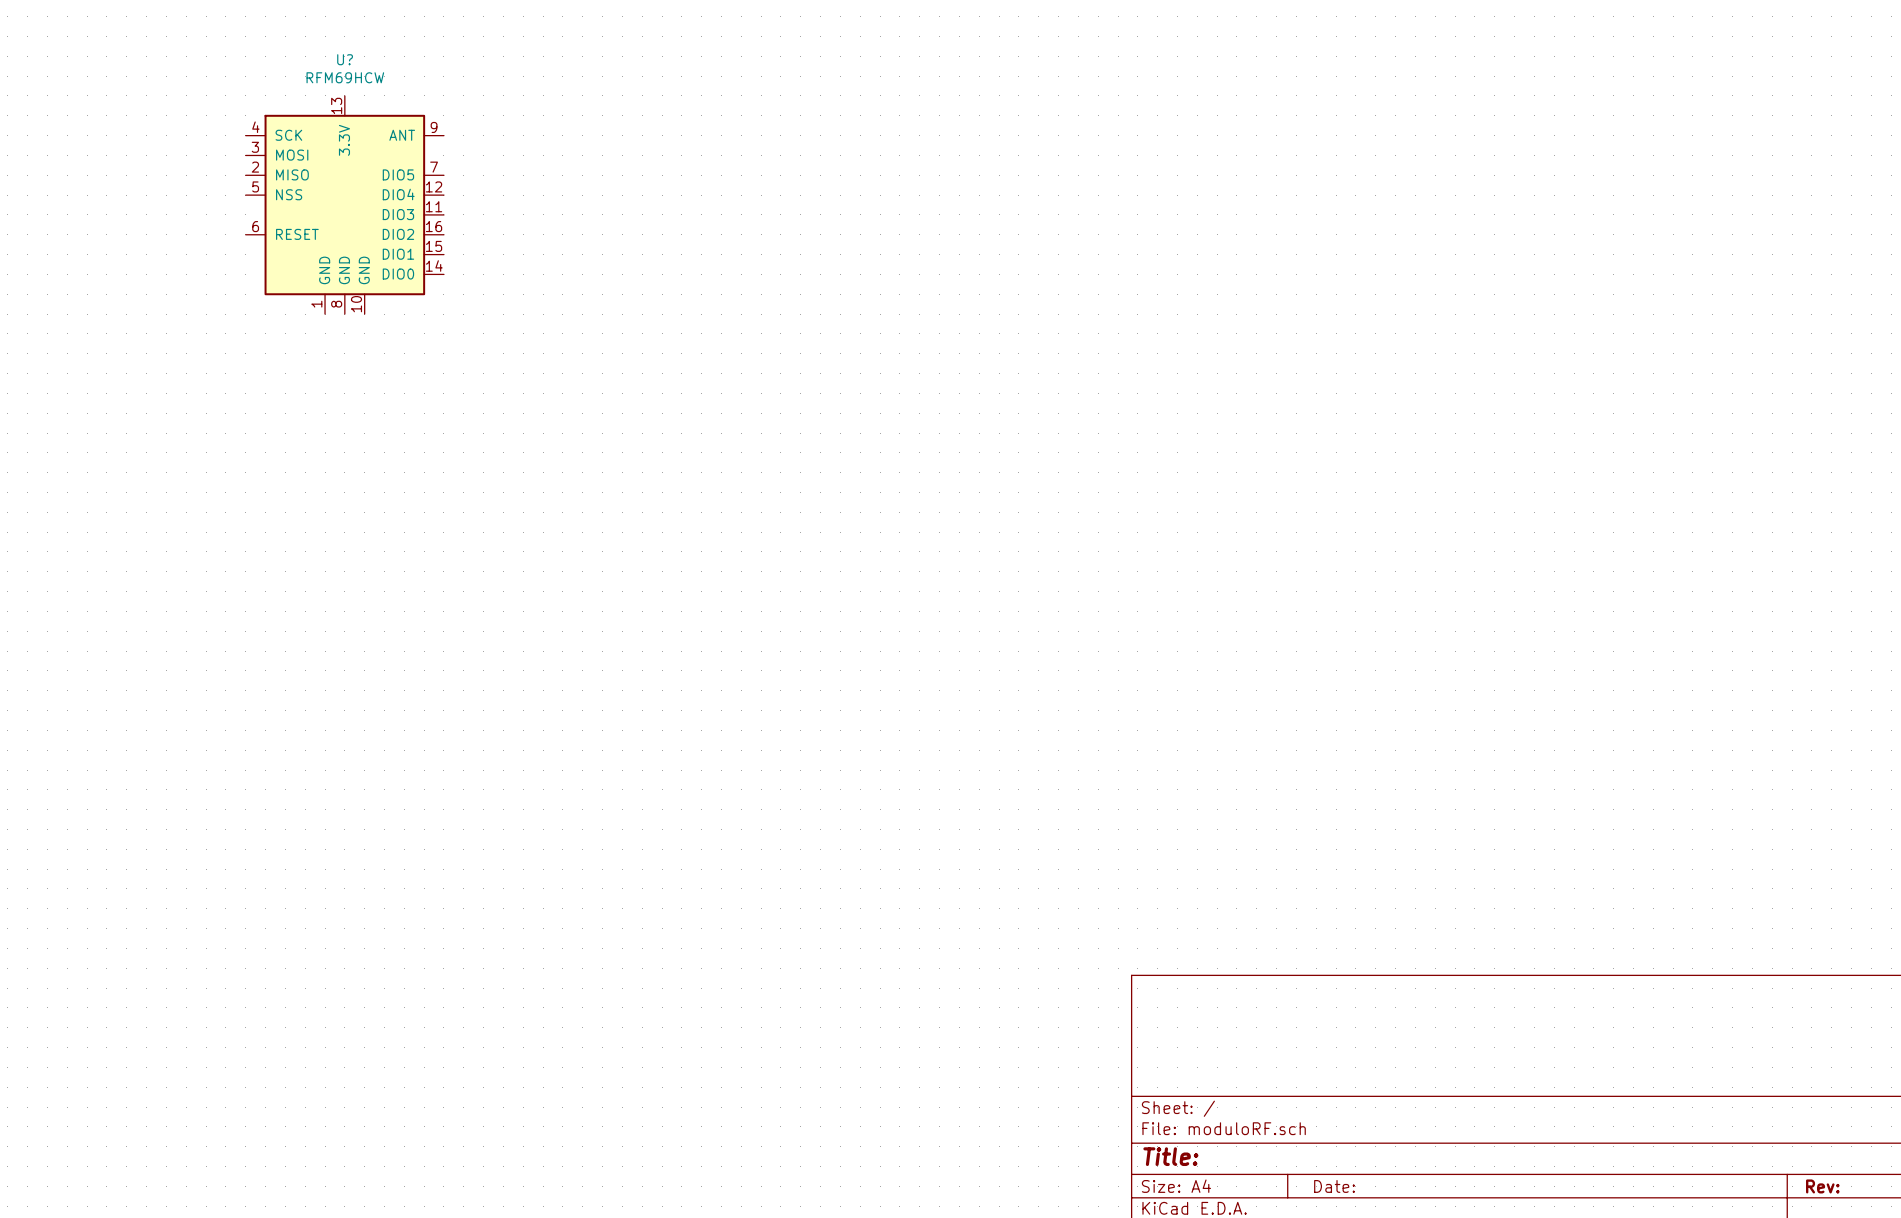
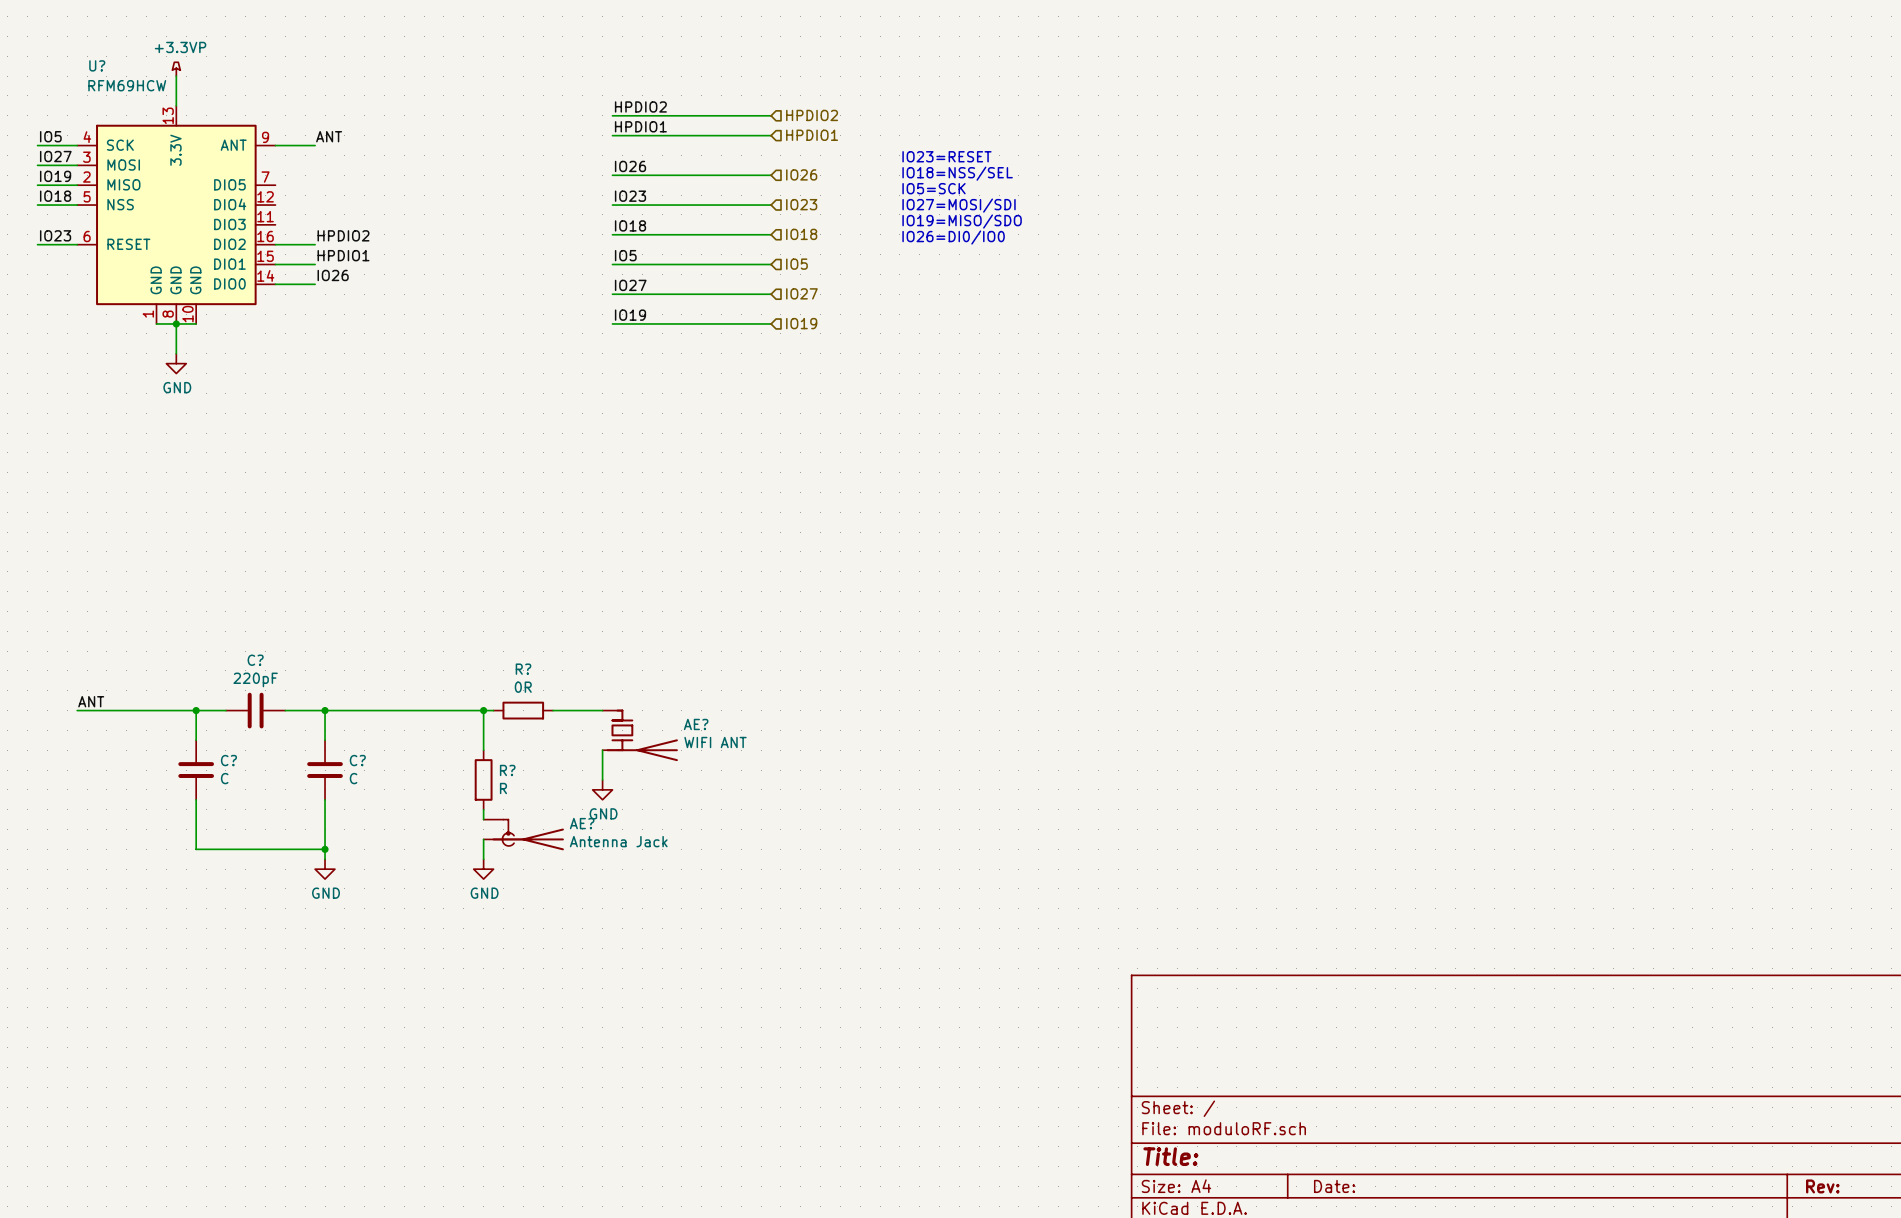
U? name position: U? (345, 59) -> U? (97, 65)
power symbol: none -> +3.3VP (176, 69)
wire: none -> (176, 76) (176, 105)
U? value position: RFM69HCW (345, 77) -> RFM69HCW (127, 85)
label: none -> HPDIO2 (640, 106)
wire: none -> (612, 115) (771, 115)
hierarchical label: none -> HPDIO2 (812, 115)
label: none -> HPDIO1 (640, 126)
wire: none -> (612, 135) (771, 135)
hierarchical label: none -> HPDIO1 (812, 135)
label: none -> IO5 (50, 136)
label: none -> ANT (329, 136)
wire: none -> (37, 145) (77, 145)
label: none -> IO27 (55, 156)
text: none -> IO23=RESET (946, 156)
wire: none -> (37, 165) (77, 165)
label: none -> IO26 (630, 166)
text: none -> IO18=NSS/SEL (957, 173)
hierarchical label: none -> IO26 (801, 174)
wire: none -> (612, 175) (771, 175)
label: none -> IO19 (55, 176)
wire: none -> (37, 185) (77, 185)
text: none -> IO5=SCK (934, 188)
label: none -> IO18 (55, 196)
label: none -> IO23 (630, 196)
hierarchical label: none -> IO23 (801, 204)
wire: none -> (37, 205) (77, 205)
U? position: (344, 205) -> (176, 214)
wire: none -> (612, 205) (771, 205)
text: none -> IO27=MOSI/SDI (959, 205)
text: none -> IO19=MISO/SDO (962, 221)
label: none -> IO18 (630, 225)
wire: none -> (612, 234) (771, 234)
hierarchical label: none -> IO18 (801, 234)
label: none -> IO23 (55, 235)
label: none -> HPDIO2 (343, 235)
text: none -> IO26=DI0/IO0 (953, 237)
wire: none -> (37, 244) (77, 244)
label: none -> HPDIO1 (343, 255)
label: none -> IO5 (625, 255)
wire: none -> (612, 264) (771, 264)
hierarchical label: none -> IO5 (796, 264)
label: none -> IO26 (333, 275)
label: none -> IO27 (630, 285)
hierarchical label: none -> IO27 (801, 293)
wire: none -> (612, 294) (771, 294)
label: none -> IO19 (630, 315)
wire: none -> (156, 323) (196, 323)
wire: none -> (176, 323) (176, 353)
junction: none -> (176, 323)
wire: none -> (612, 323) (771, 323)
hierarchical label: none -> IO19 (801, 323)
power symbol: none -> GND (176, 363)
label: none -> ANT (91, 701)
wire: none -> (77, 710) (225, 710)
wire: none -> (196, 710) (196, 740)
junction: none -> (196, 710)
C?: none -> 220pF (255, 710)
wire: none -> (285, 710) (493, 710)
wire: none -> (325, 710) (325, 740)
junction: none -> (325, 710)
wire: none -> (483, 710) (483, 750)
junction: none -> (483, 710)
R?: none -> 0R (523, 710)
wire: none -> (553, 710) (602, 710)
AE?: none -> WIFI ANT (640, 735)
wire: none -> (602, 750) (602, 779)
C?: none -> C (196, 770)
C?: none -> C (325, 770)
R?: none -> R (483, 779)
power symbol: none -> GND (602, 789)
wire: none -> (196, 799) (196, 849) (325, 849)
wire: none -> (325, 799) (325, 859)
wire: none -> (483, 809) (483, 819)
AE?: none -> Antenna Jack (523, 834)
wire: none -> (483, 839) (483, 859)
junction: none -> (325, 849)
power symbol: none -> GND (325, 869)
power symbol: none -> GND (483, 869)

